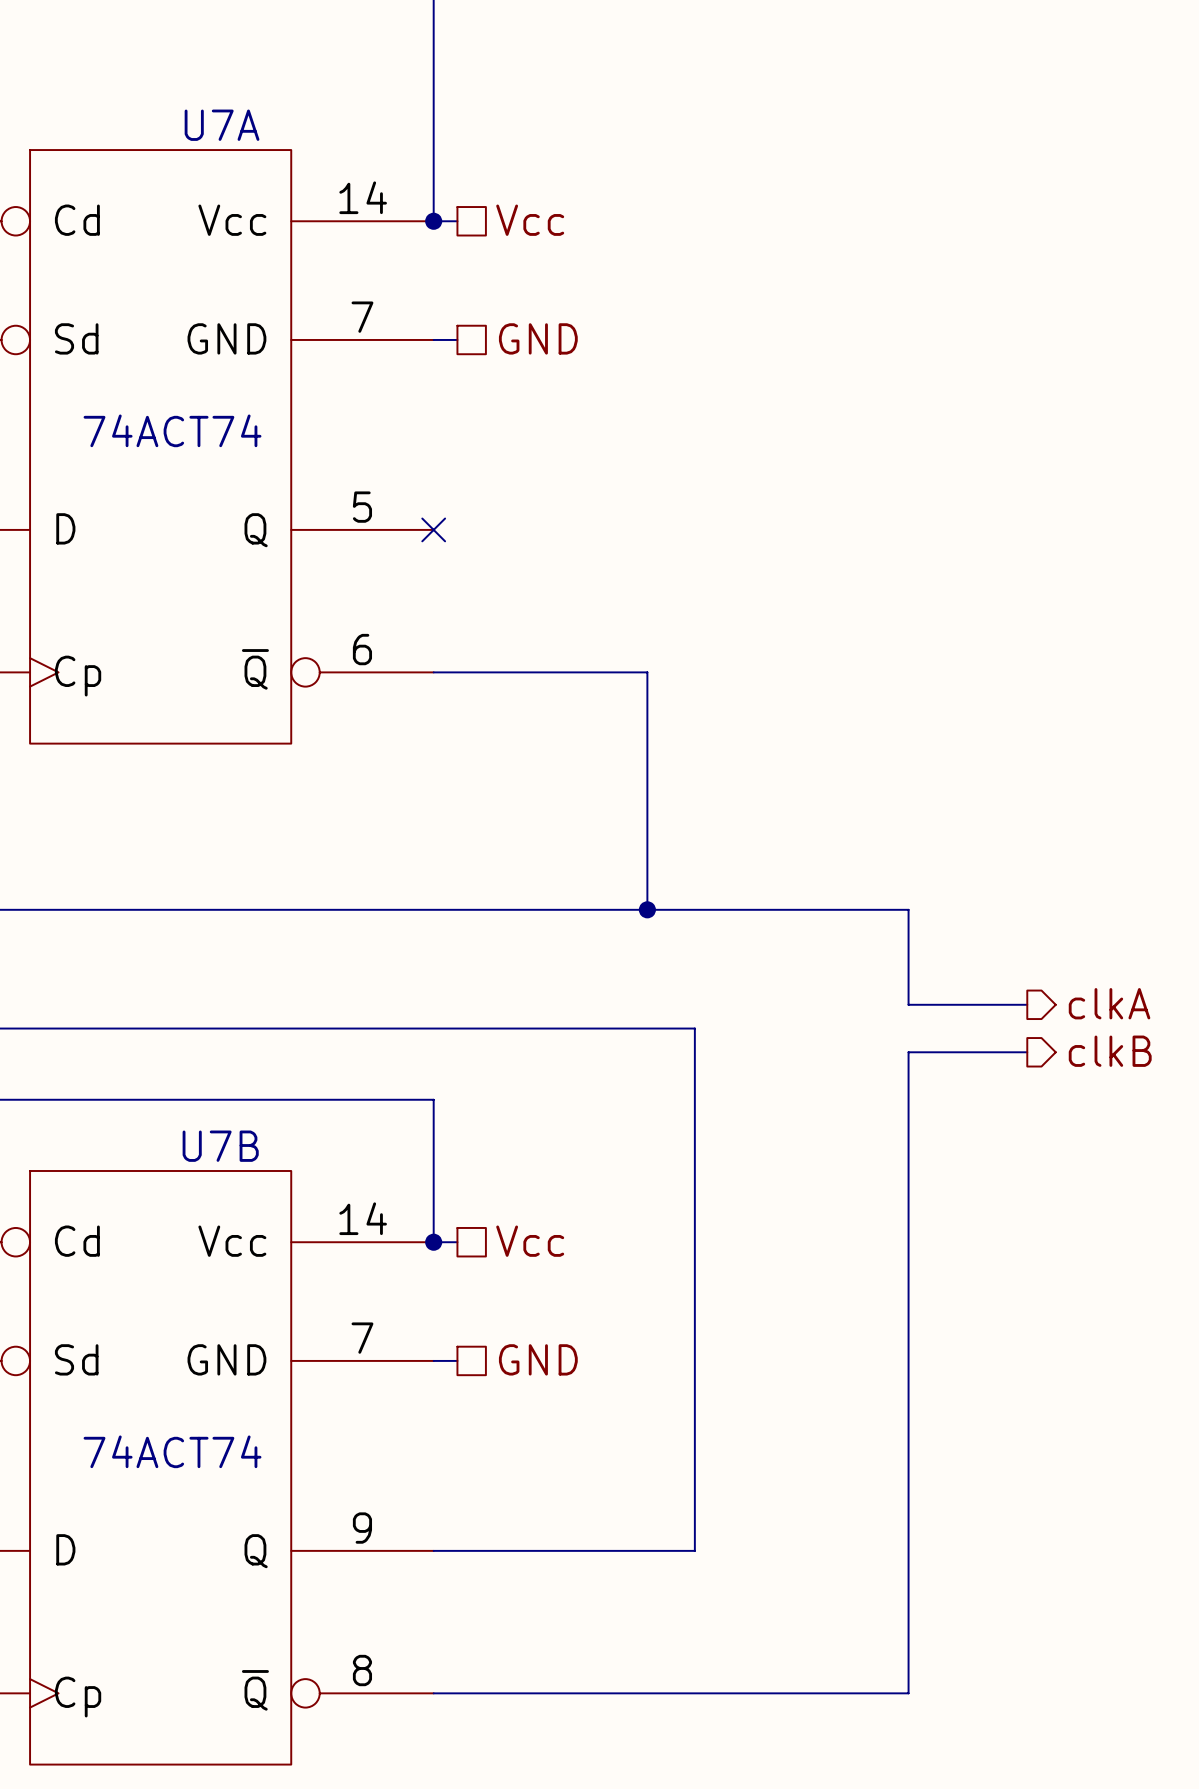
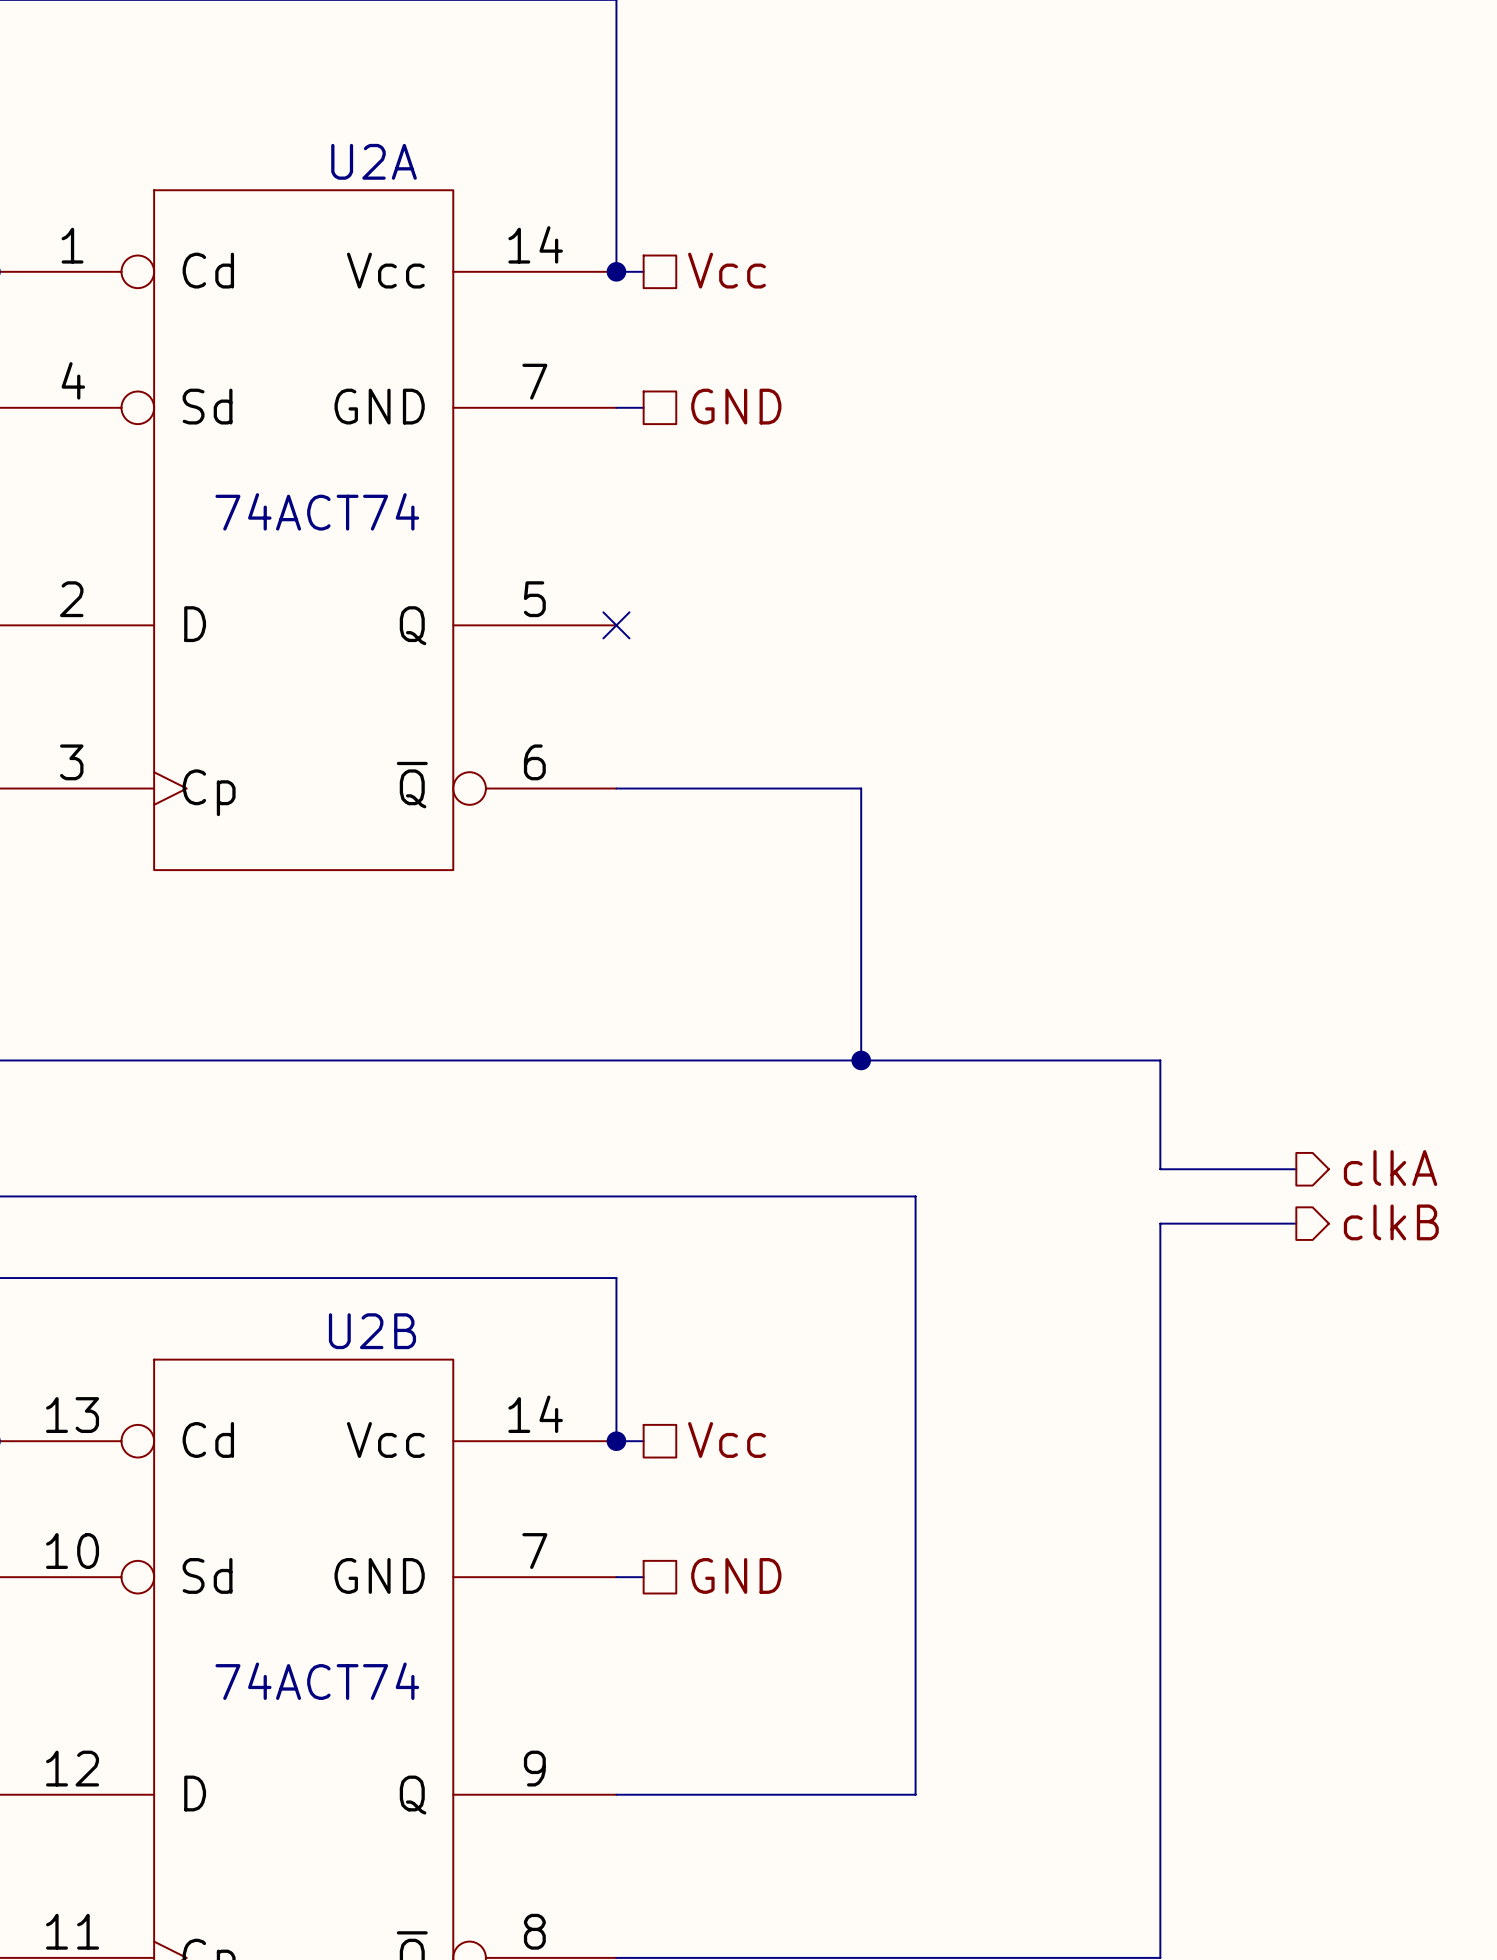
U7A name: U7A (222, 125) -> U2A (374, 161)
U7B name: U7B (220, 1146) -> U2B (372, 1331)

